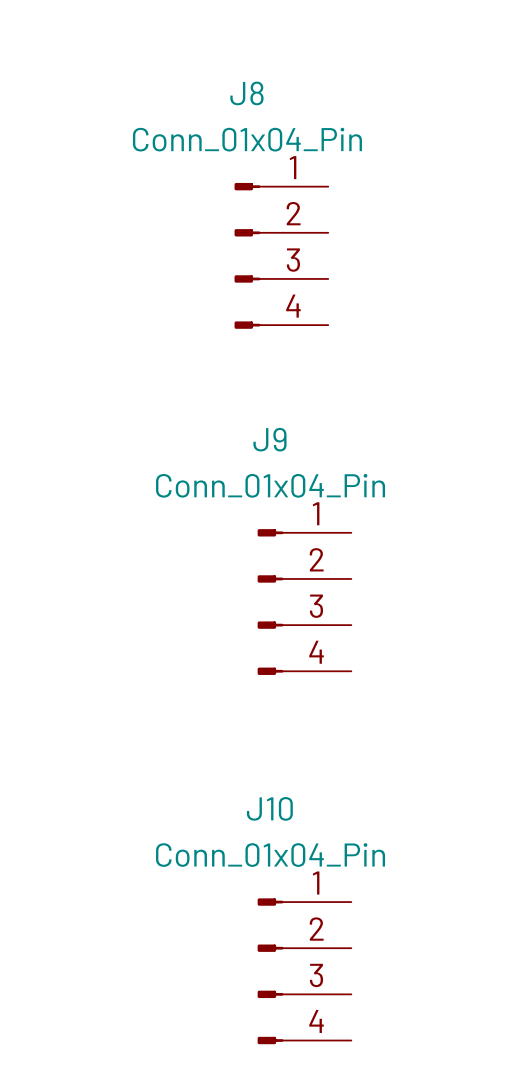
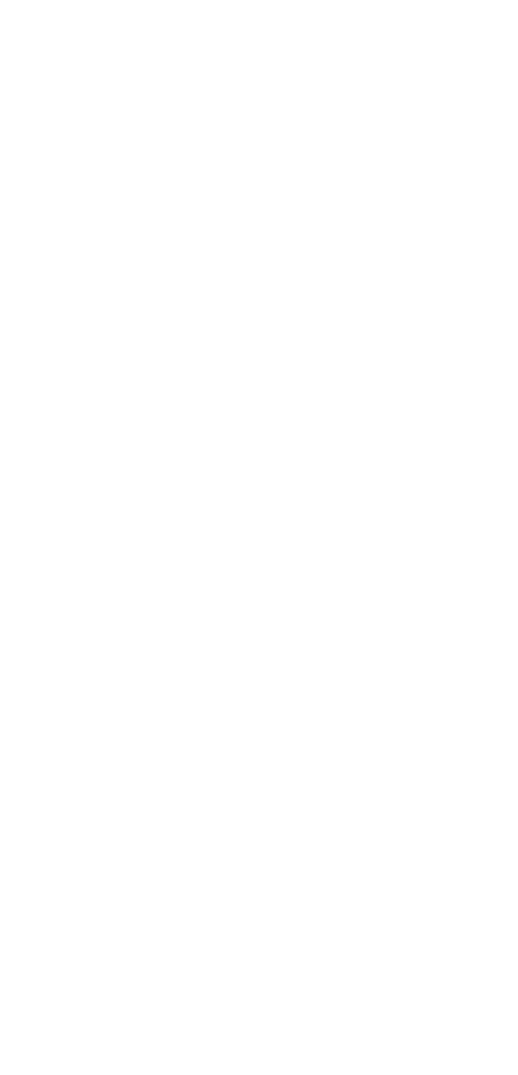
J8: Conn_01x04_Pin (281, 255) -> none
J9: Conn_01x04_Pin (304, 602) -> none
J10: Conn_01x04_Pin (304, 971) -> none

